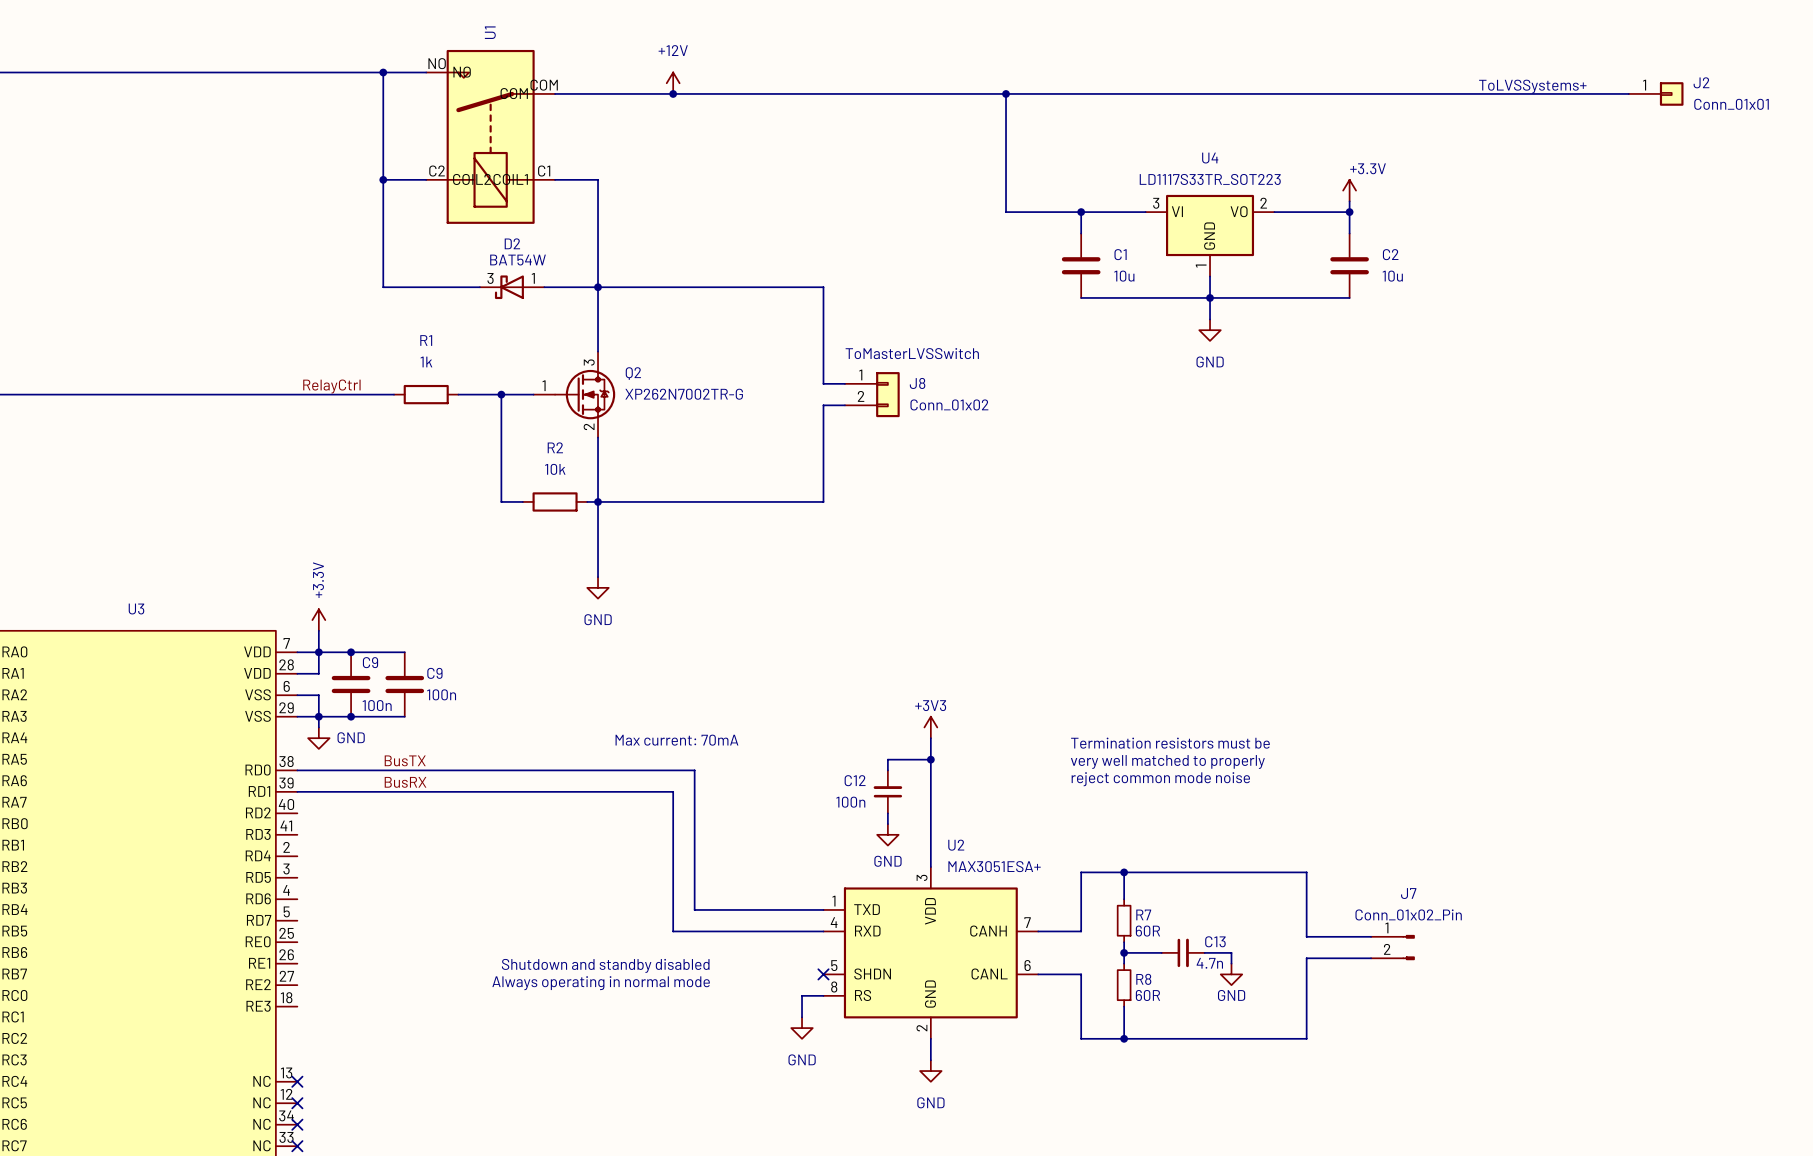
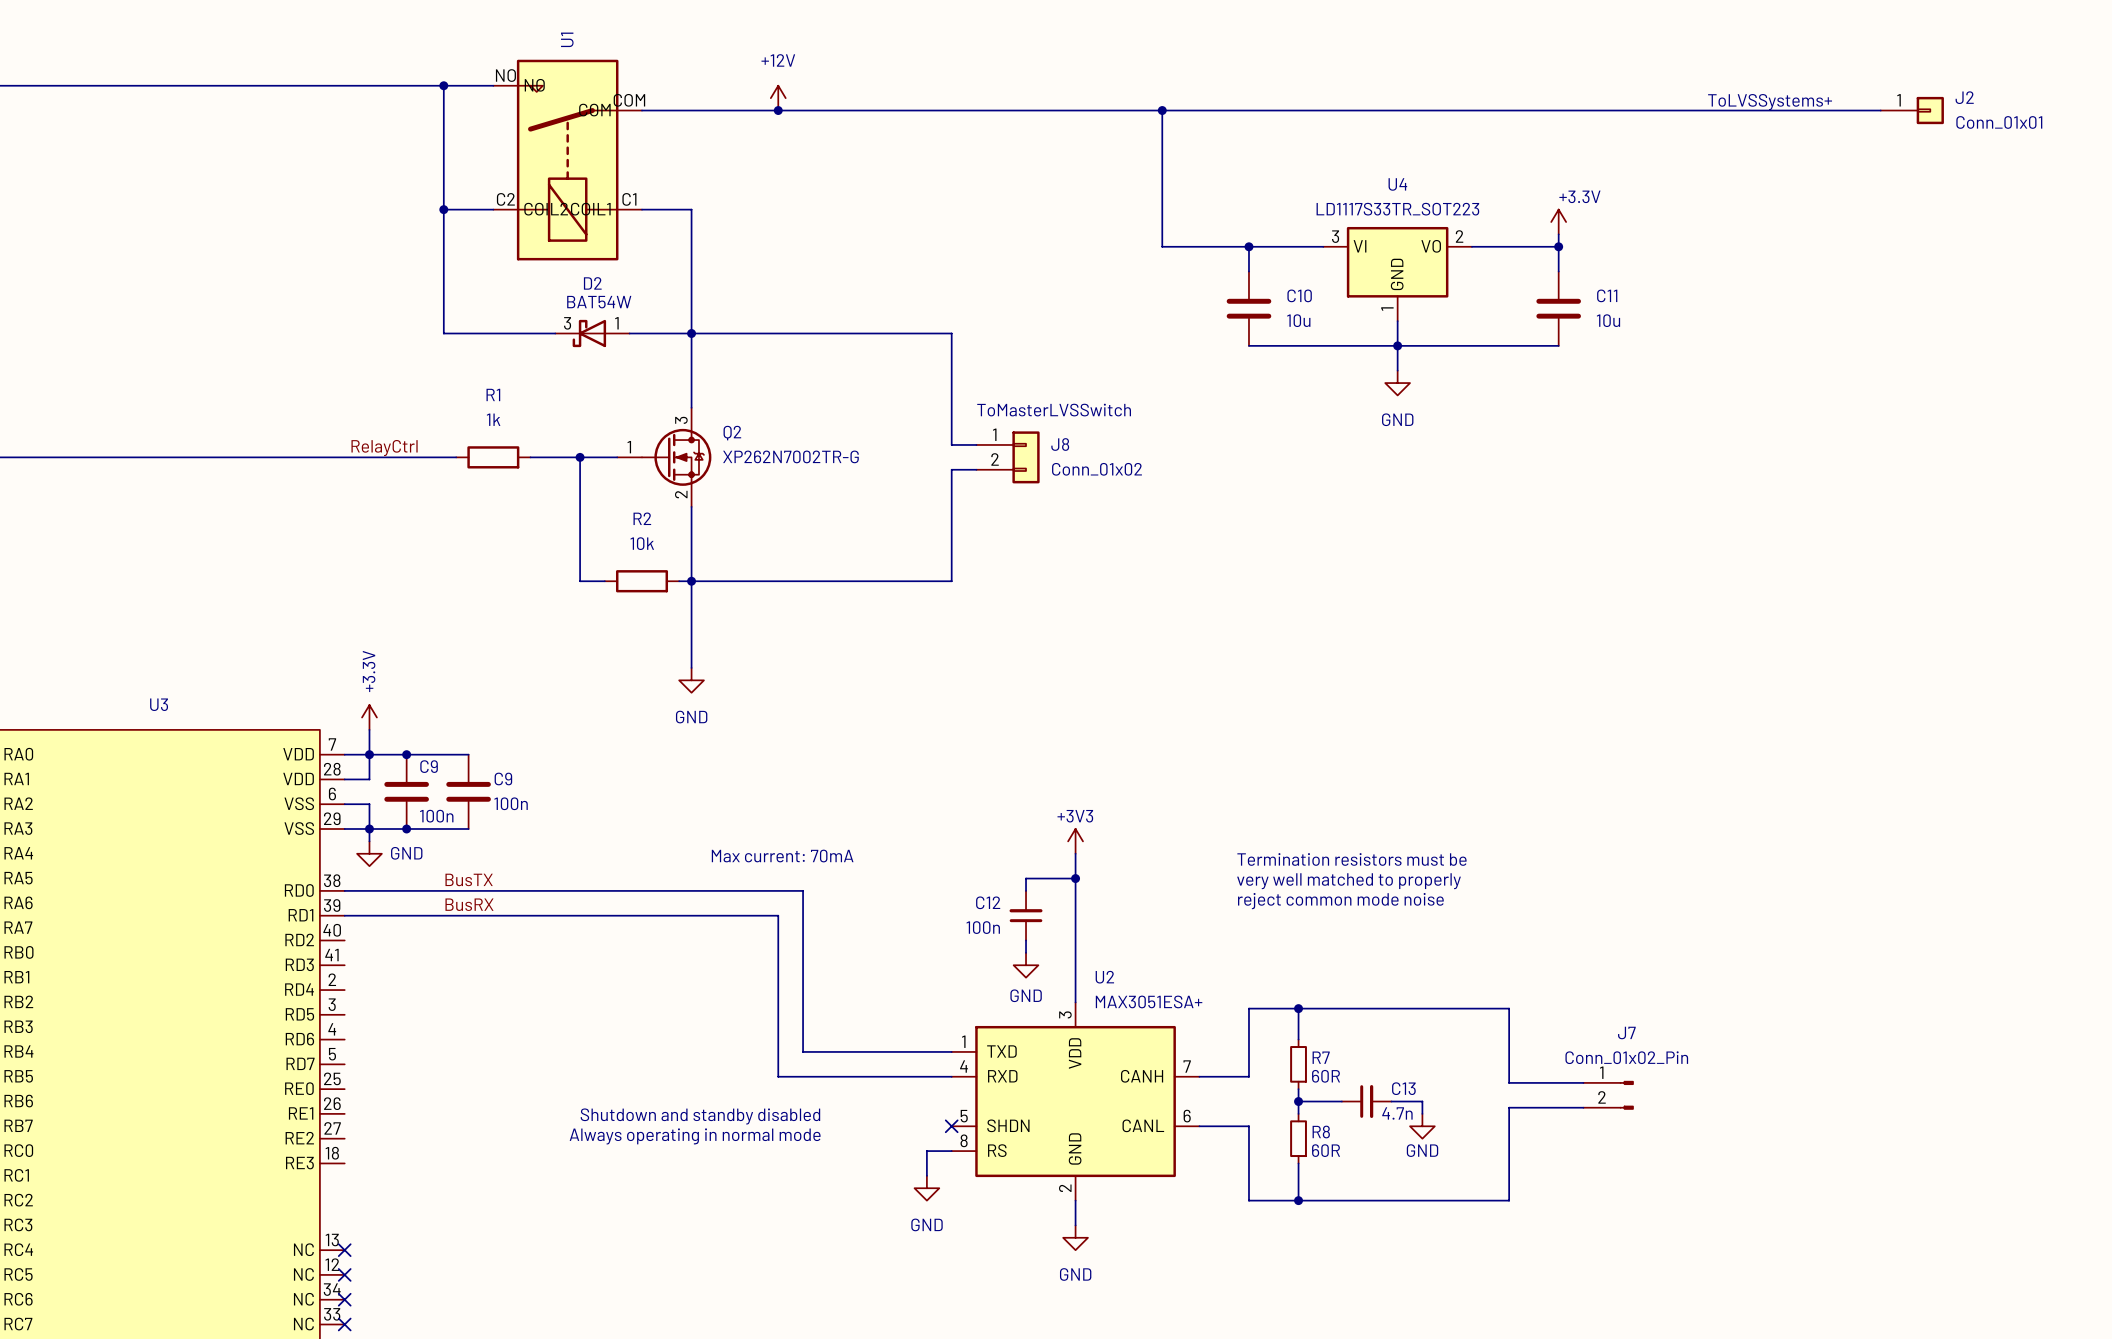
C1 name: C1 (1120, 254) -> C10 (1299, 295)
C2 name: C2 (1390, 254) -> C11 (1607, 295)

